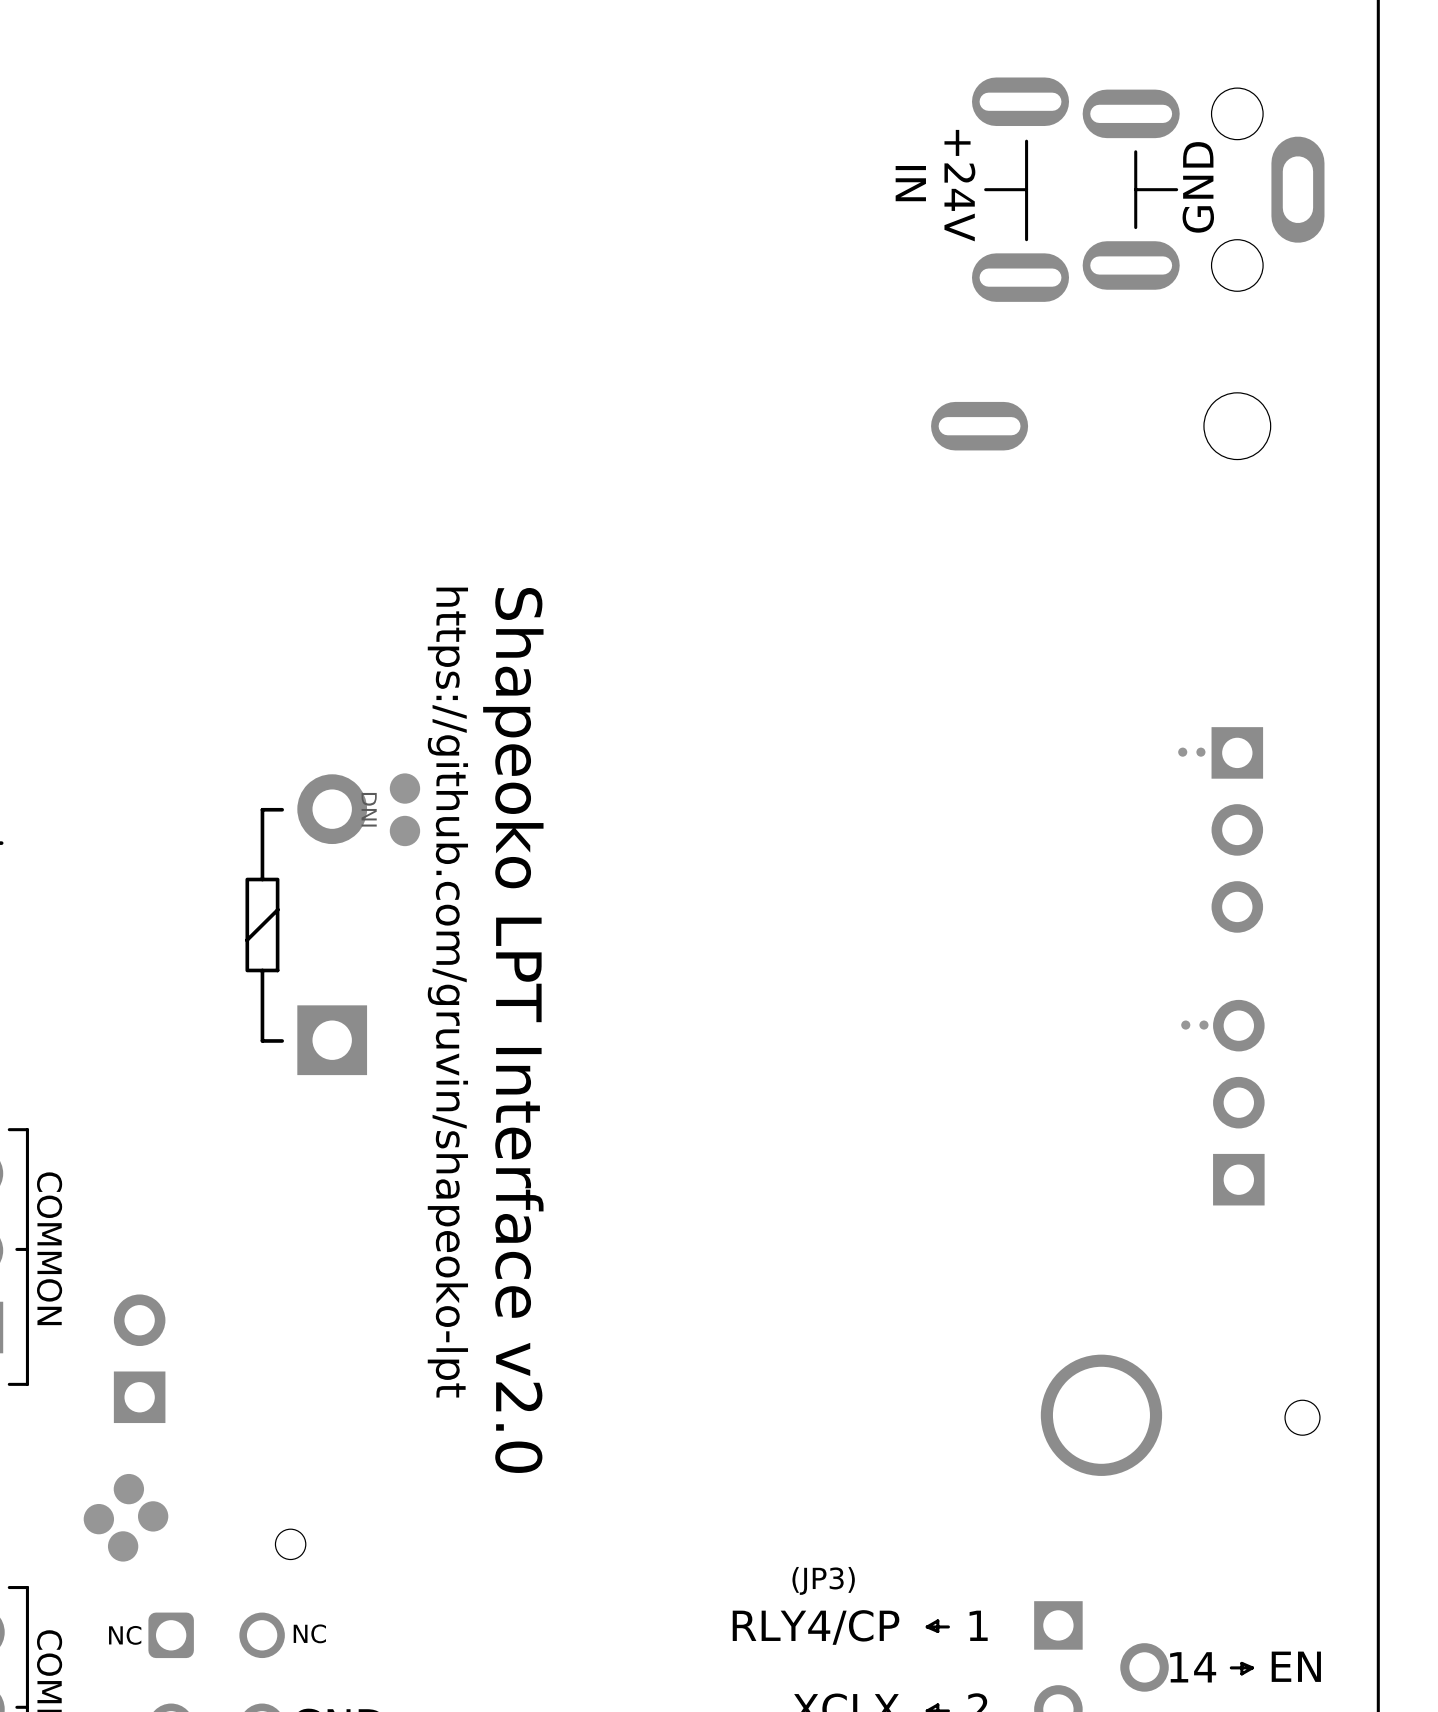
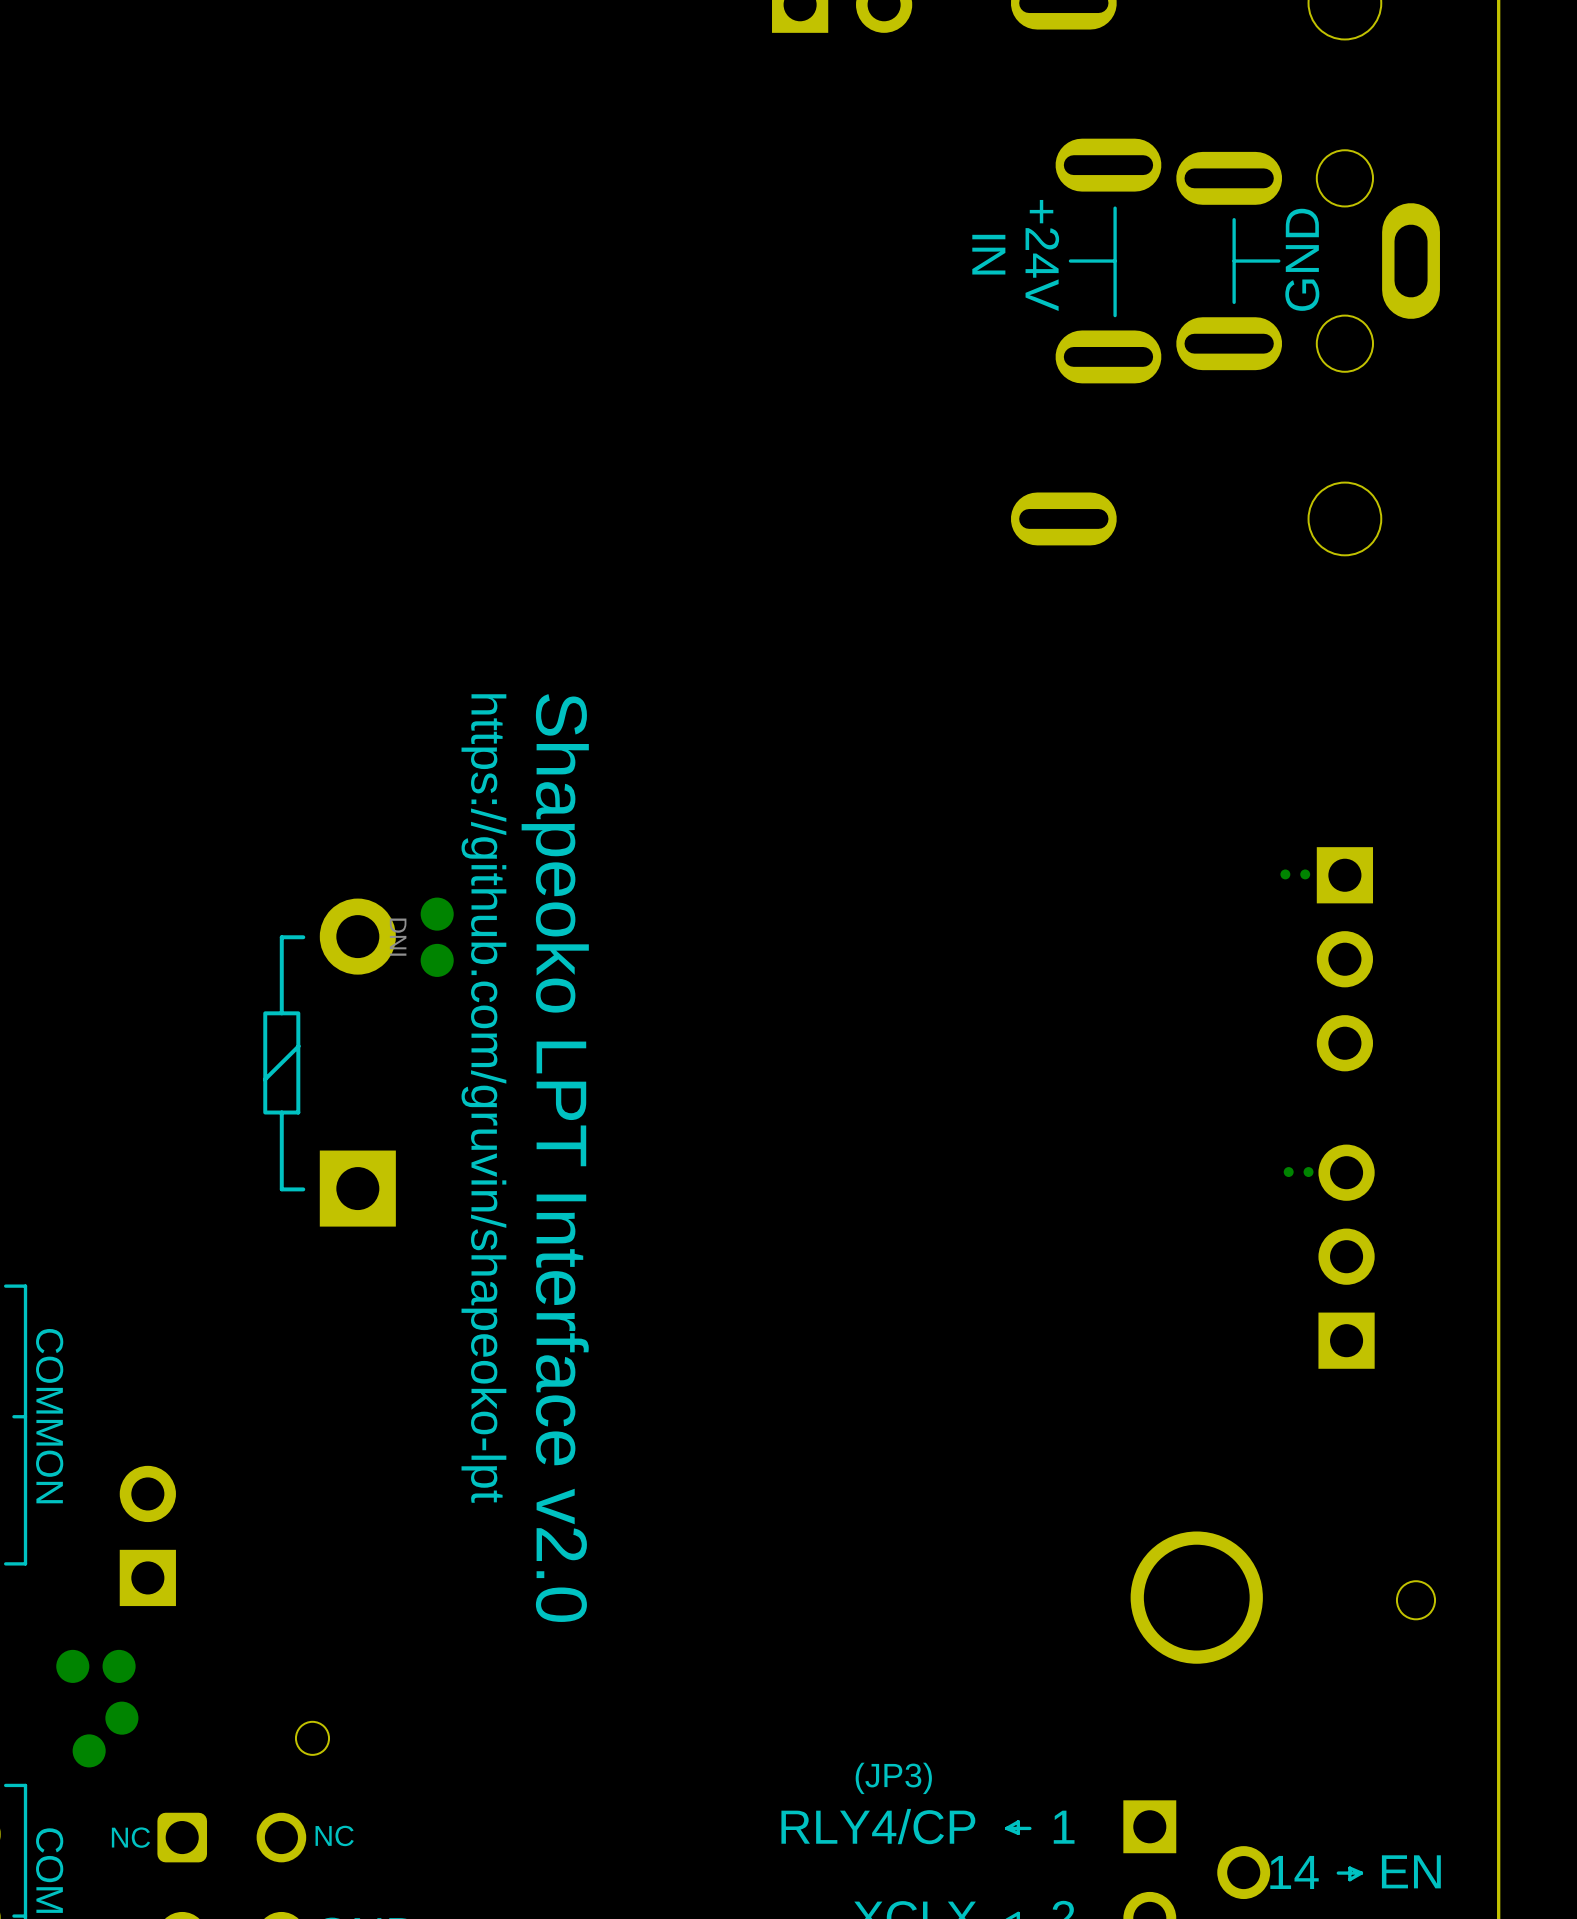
part: none -> (95, 1666)
part: (113, 1504) -> none
part: (138, 1531) -> none
part: none -> (105, 1734)

